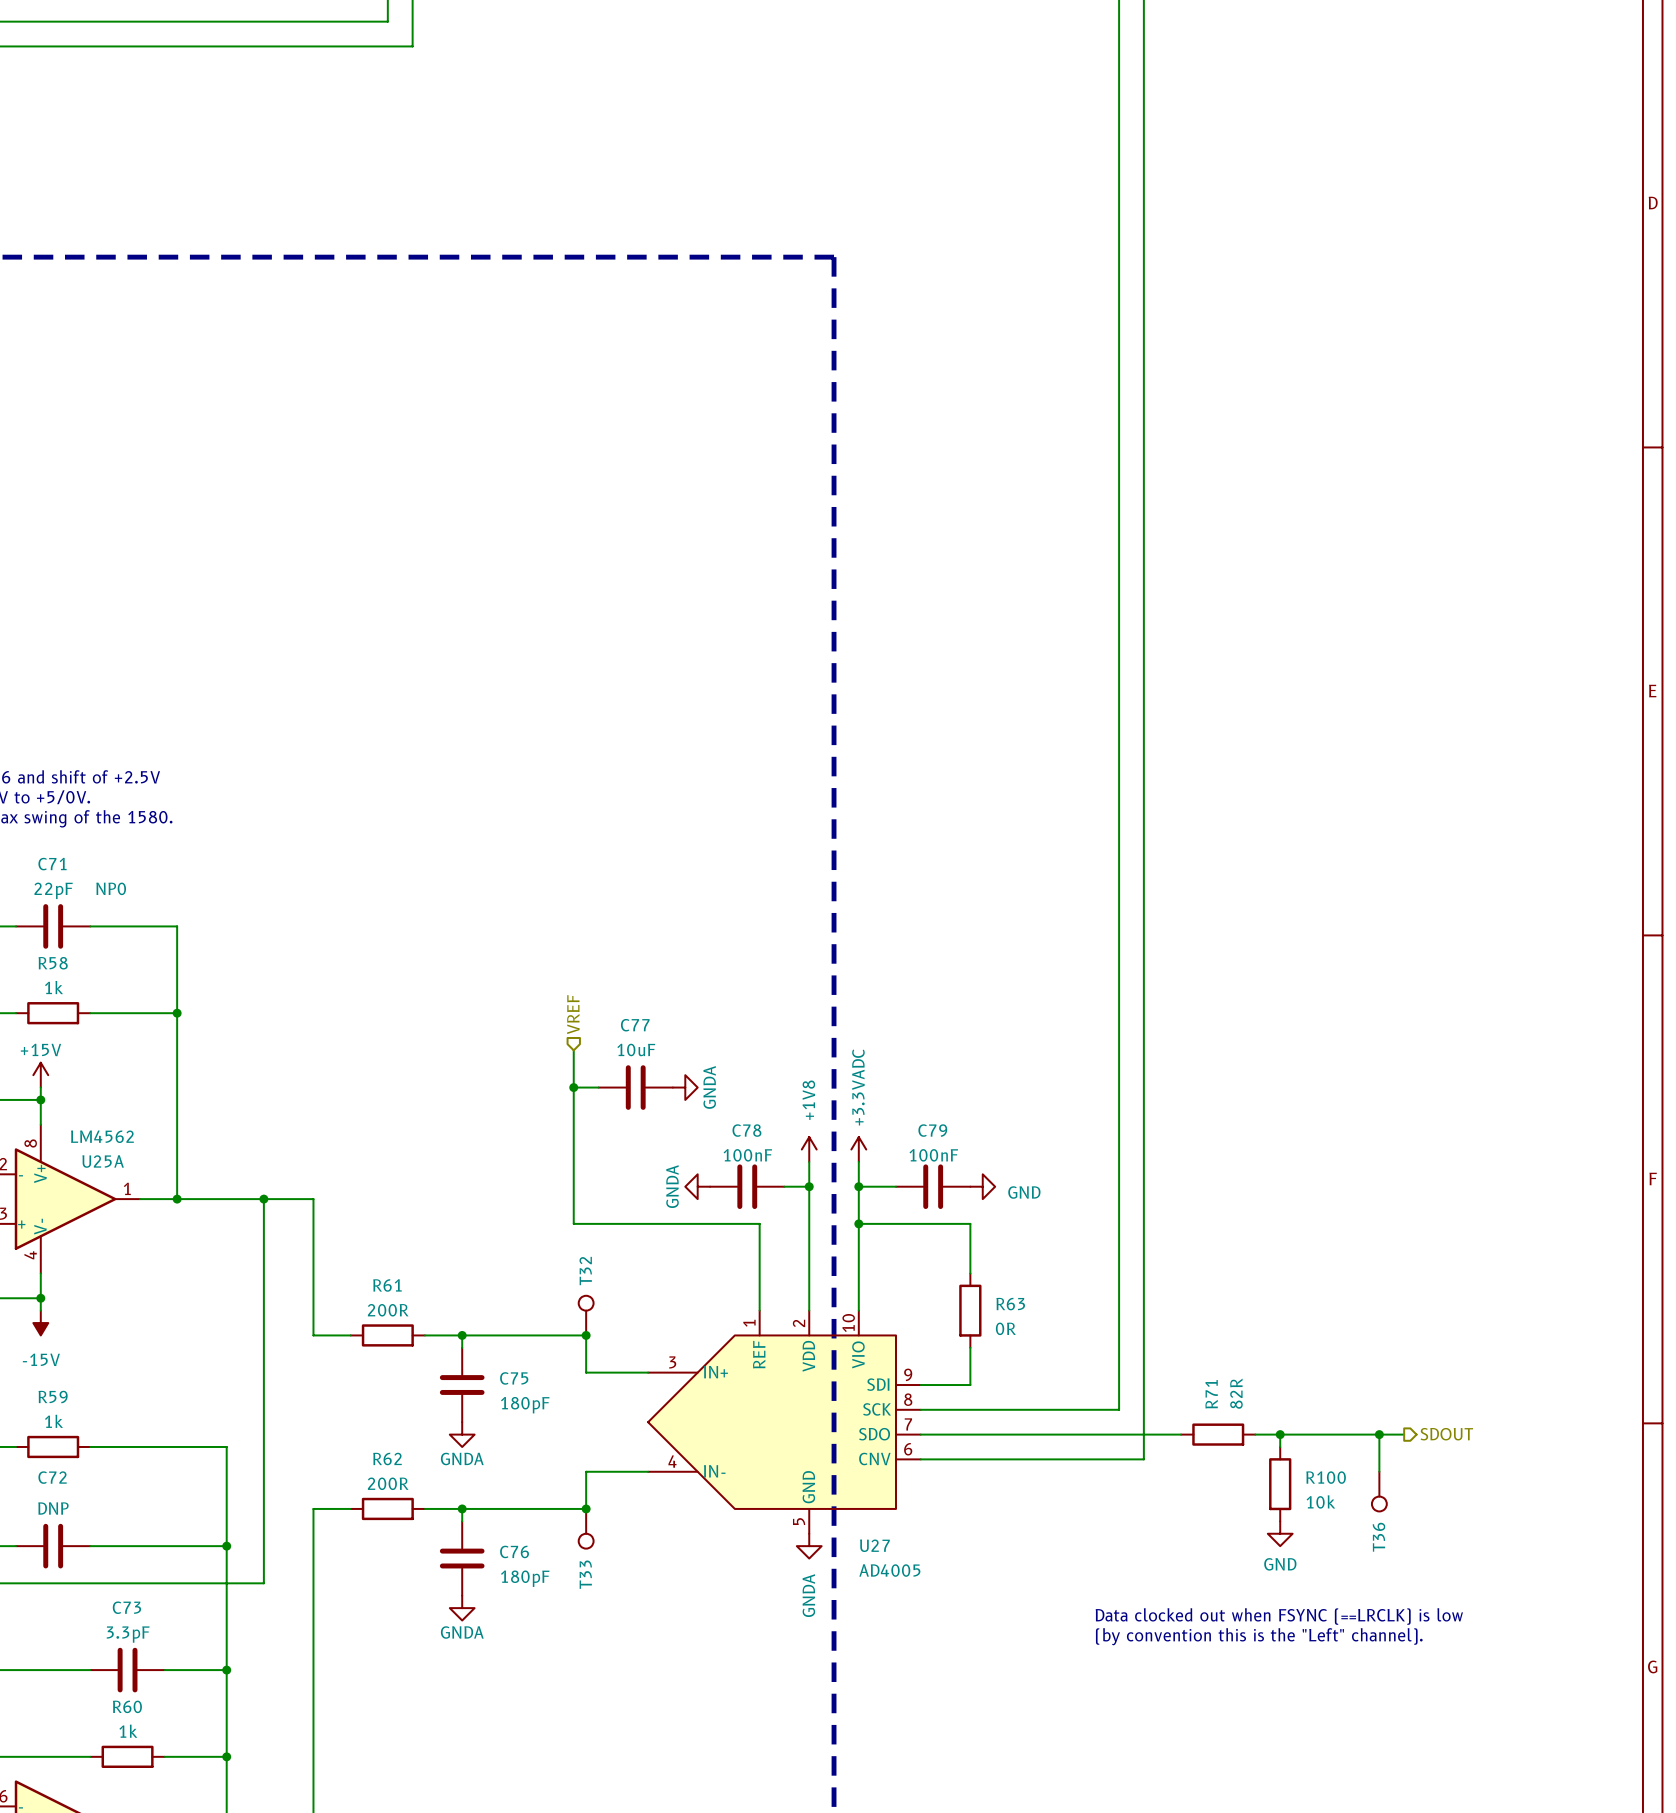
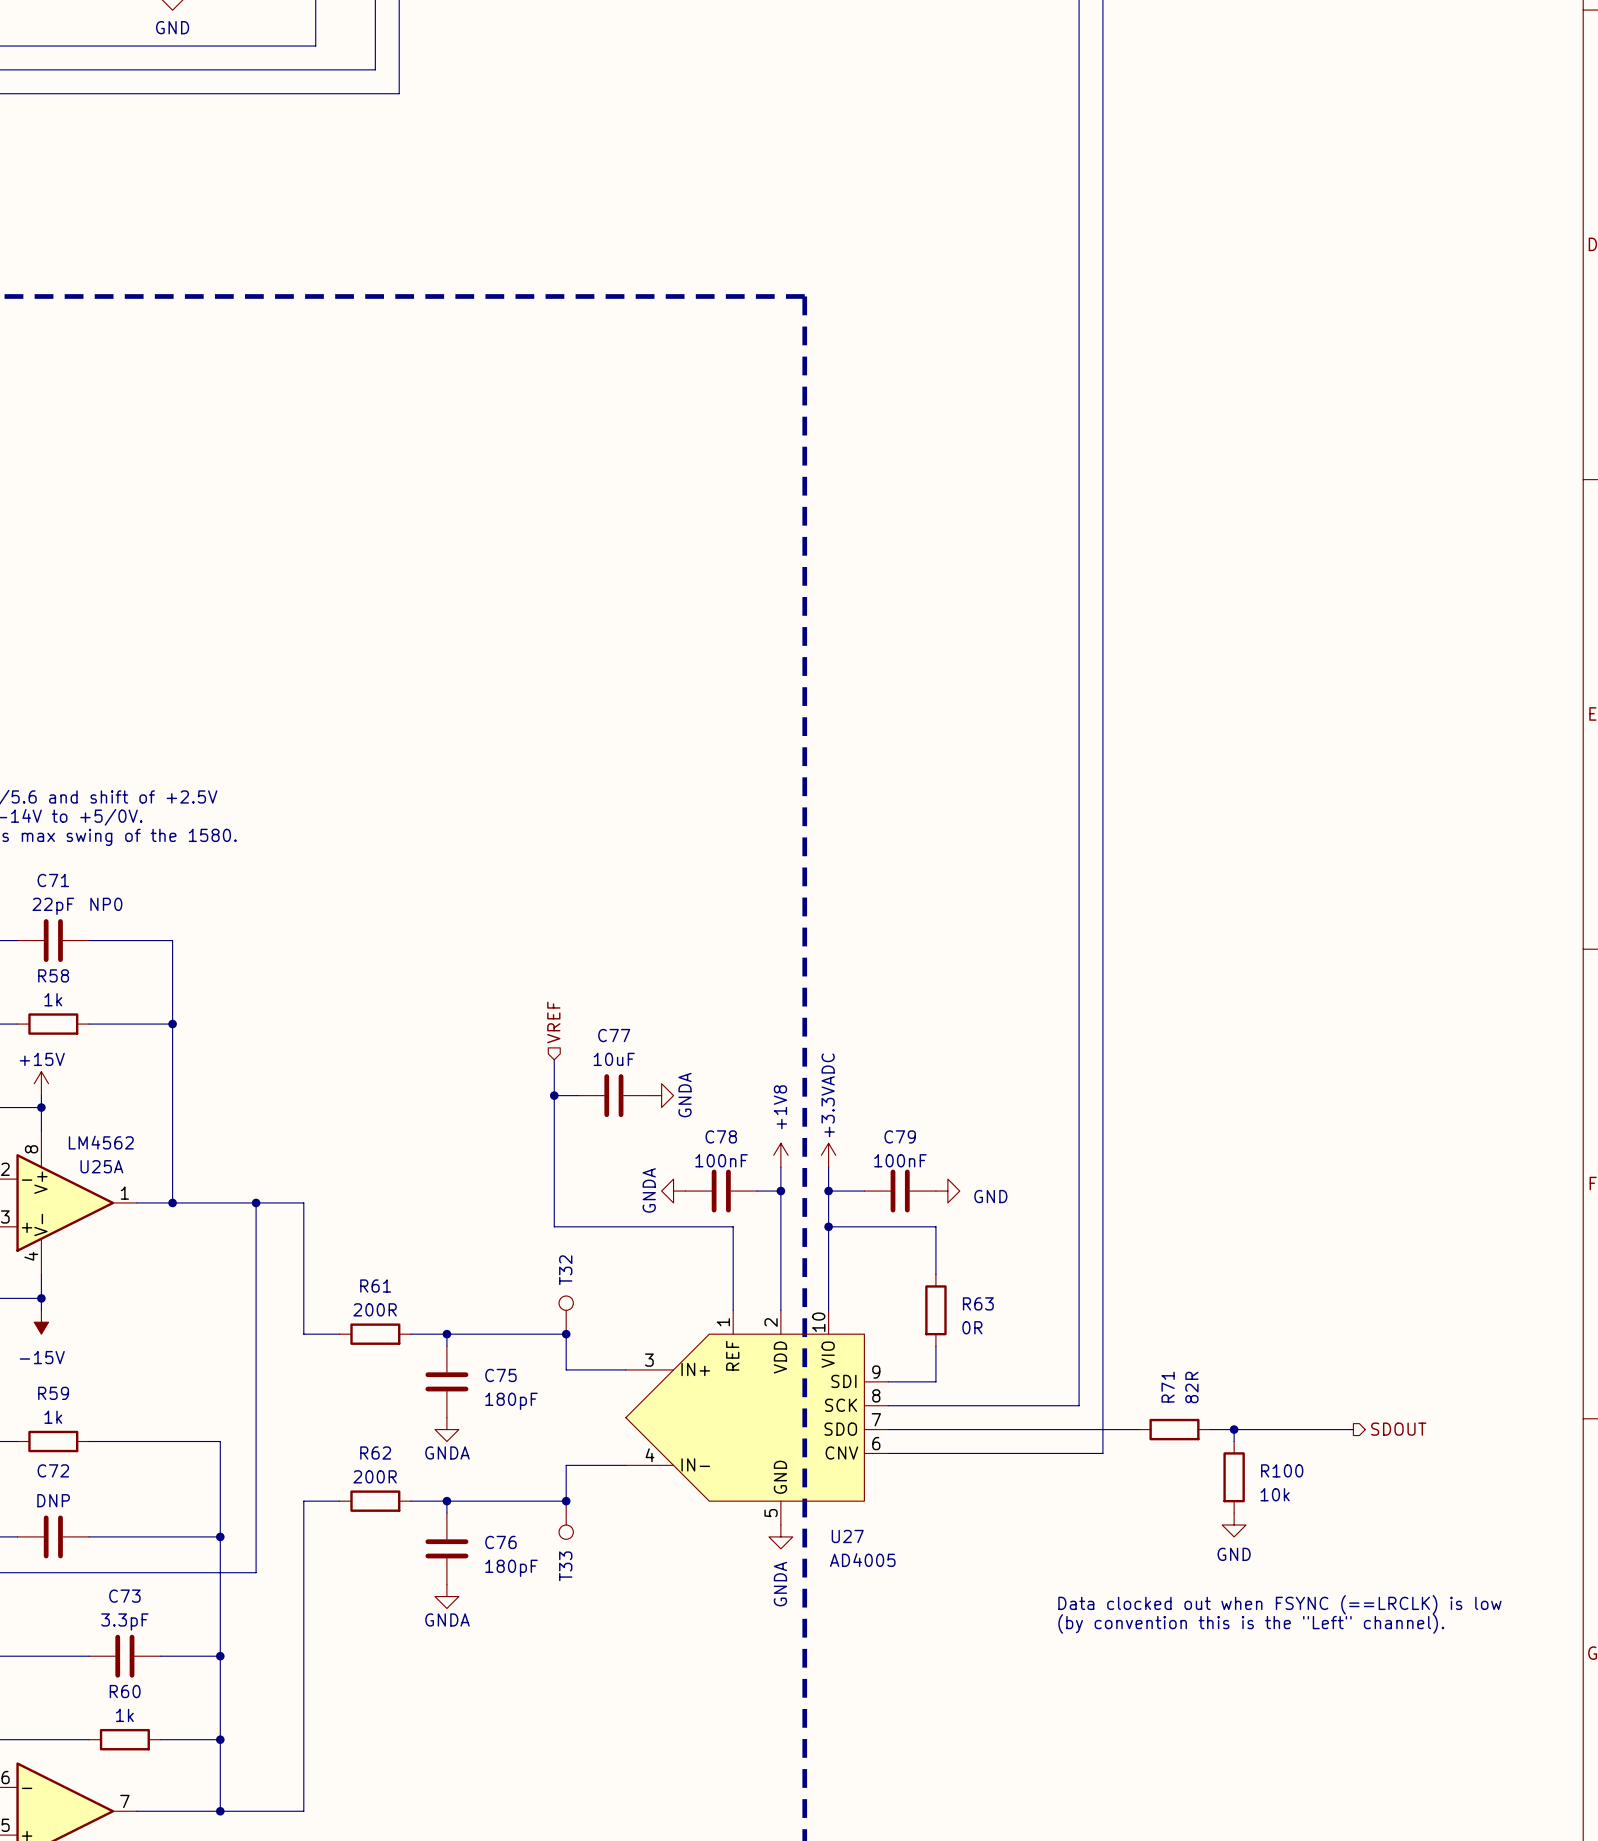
wire: (1379, 1434) (1379, 1471) -> none
junction: (1379, 1434) -> none
T36: (1379, 1491) -> none

